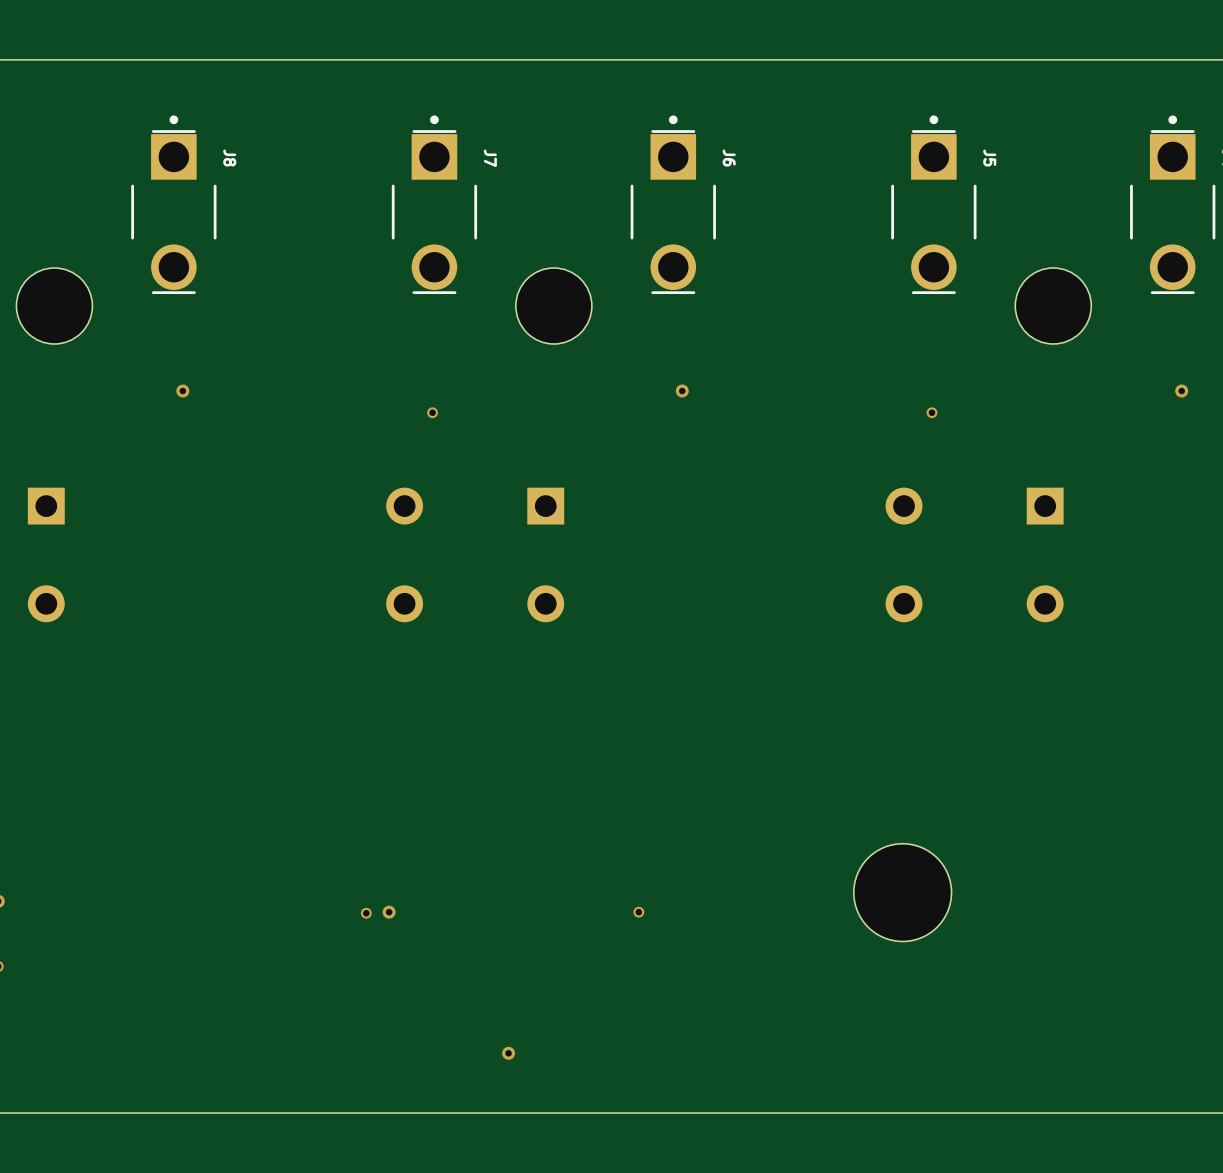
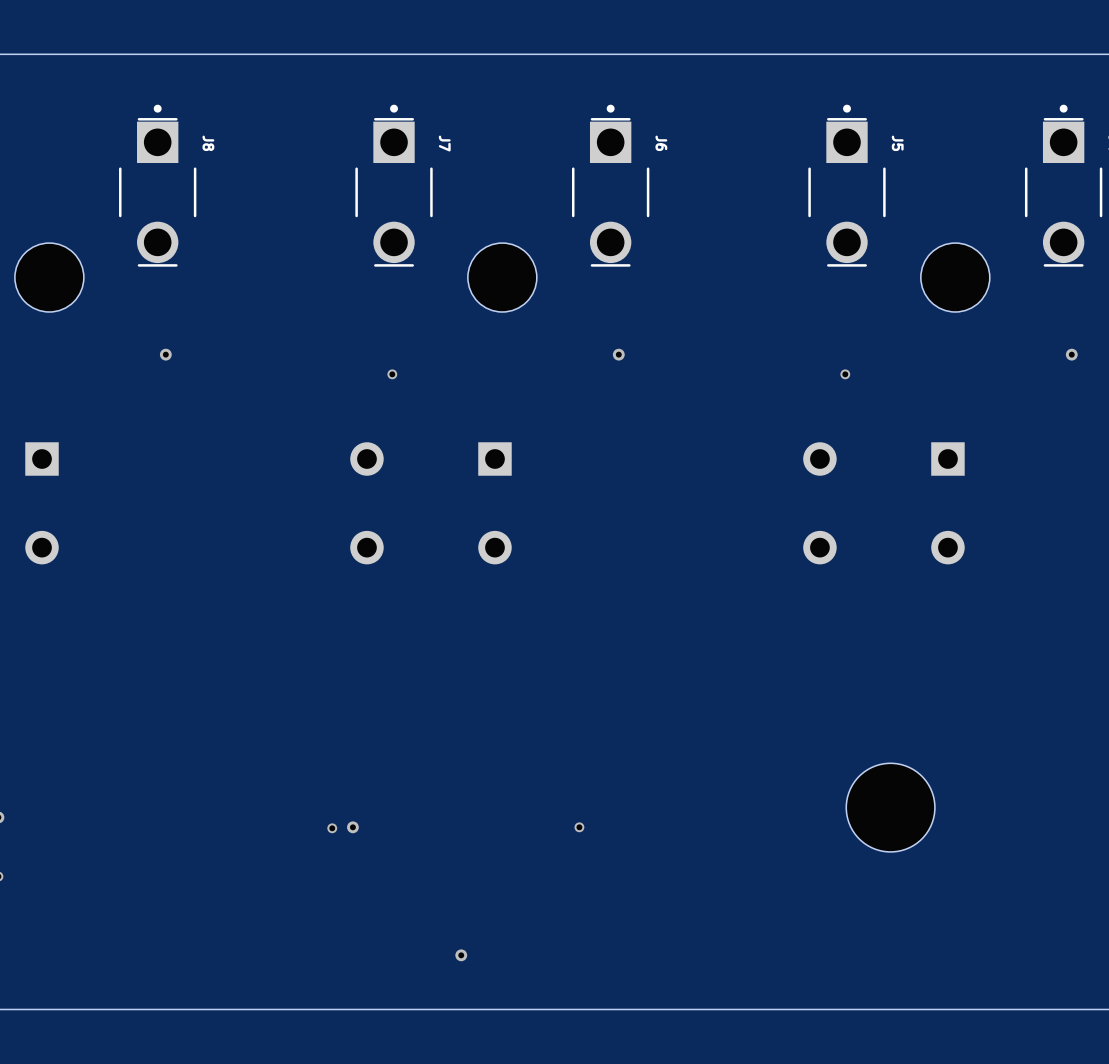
part position: (902, 892) -> (890, 807)

